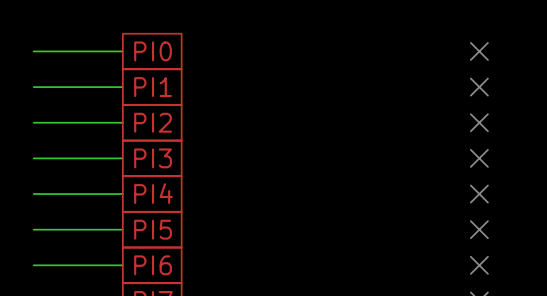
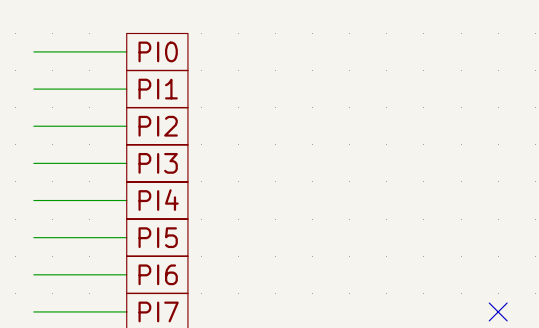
no-connect mark: (479, 51) -> none
no-connect mark: (479, 87) -> none
no-connect mark: (479, 122) -> none
no-connect mark: (479, 158) -> none
no-connect mark: (479, 194) -> none
no-connect mark: (479, 229) -> none
no-connect mark: (479, 265) -> none

